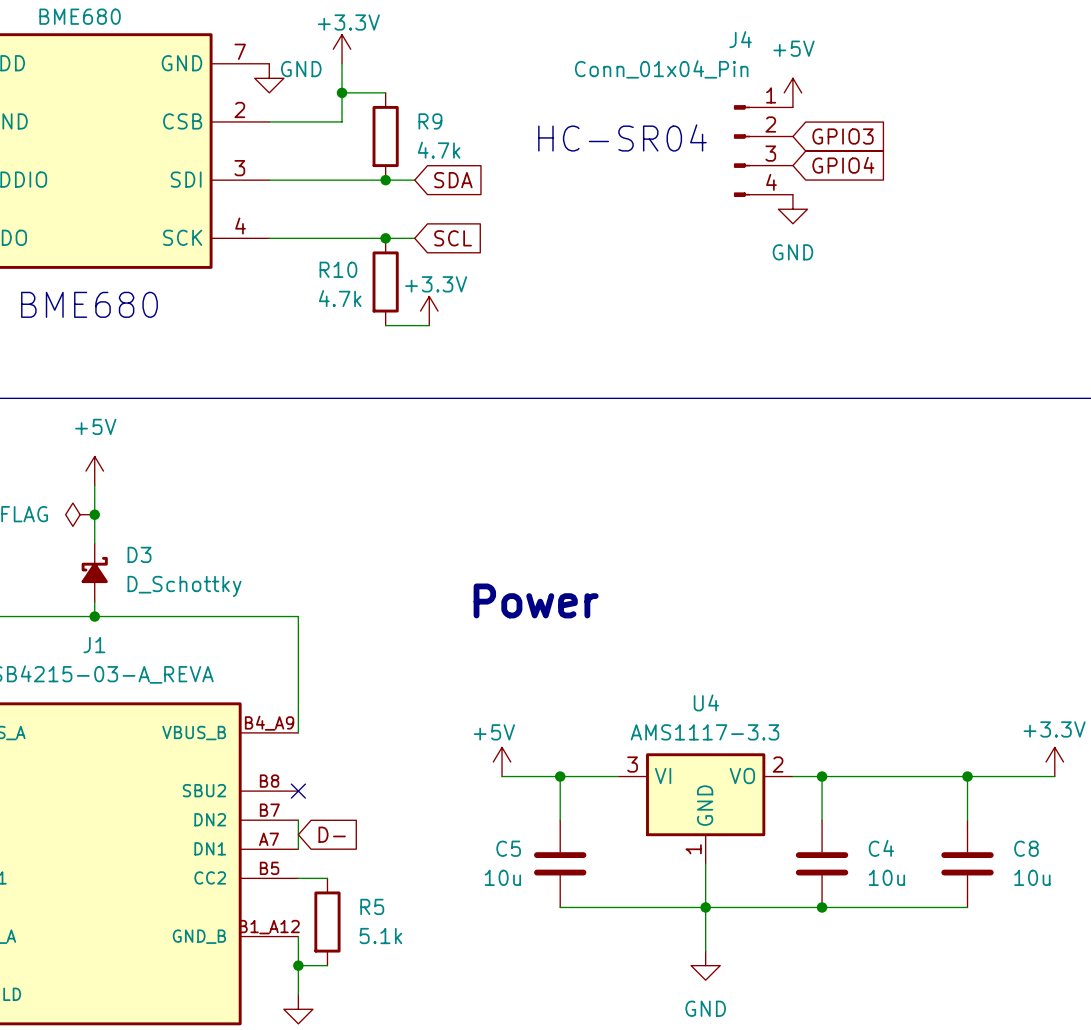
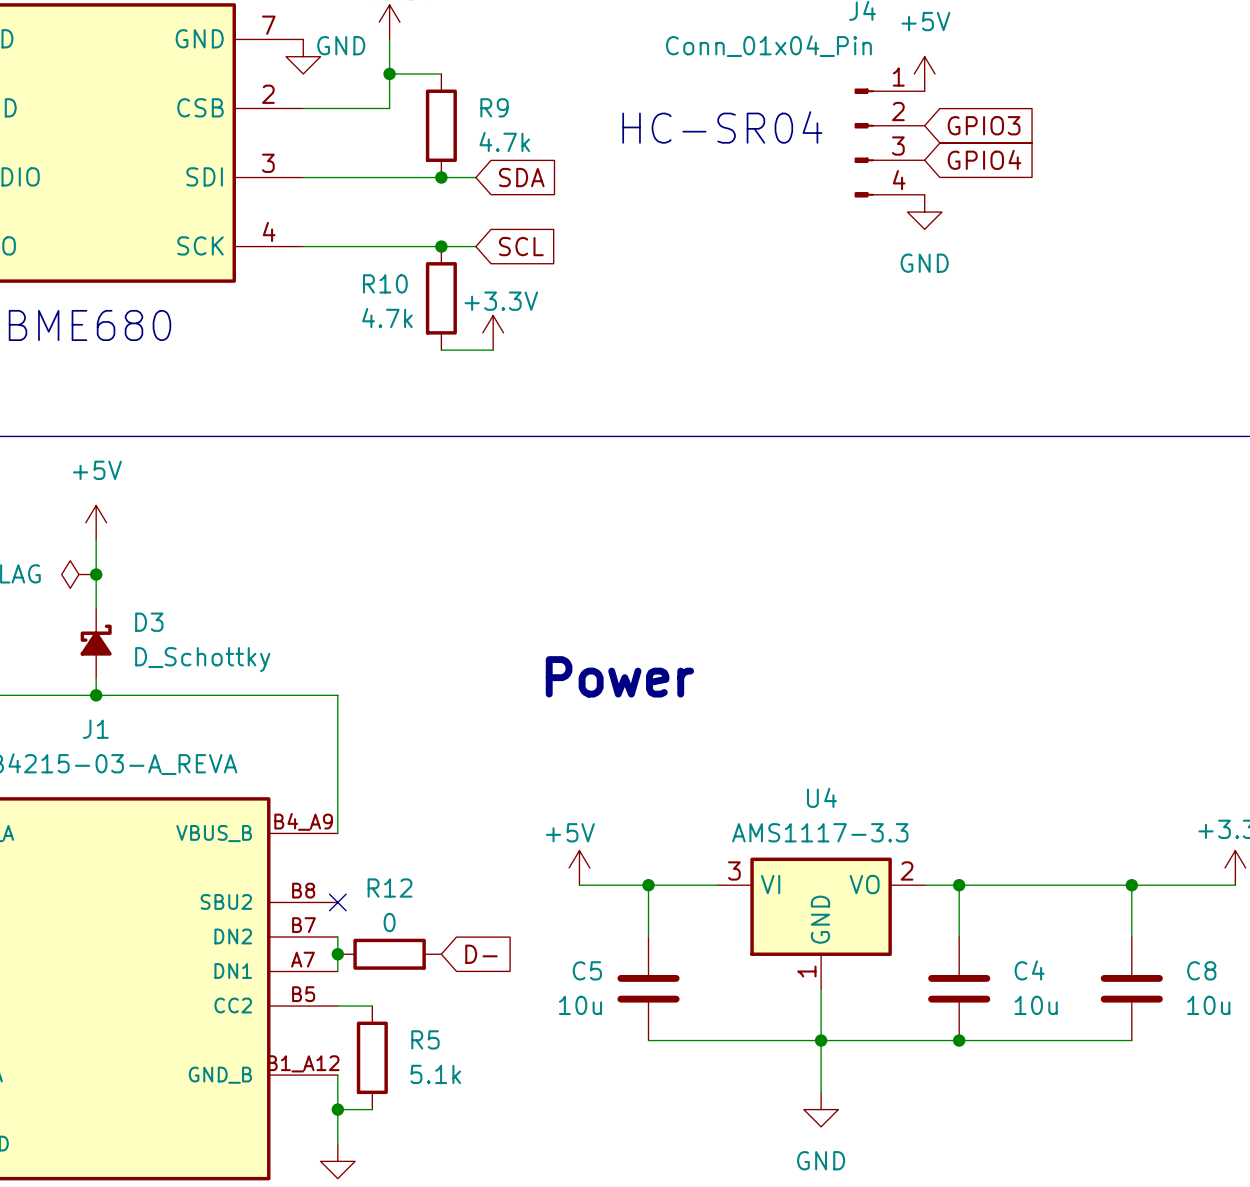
junction: none -> (337, 954)
global label position: D- (332, 834) -> D- (481, 954)
R12: none -> 0 (389, 954)

